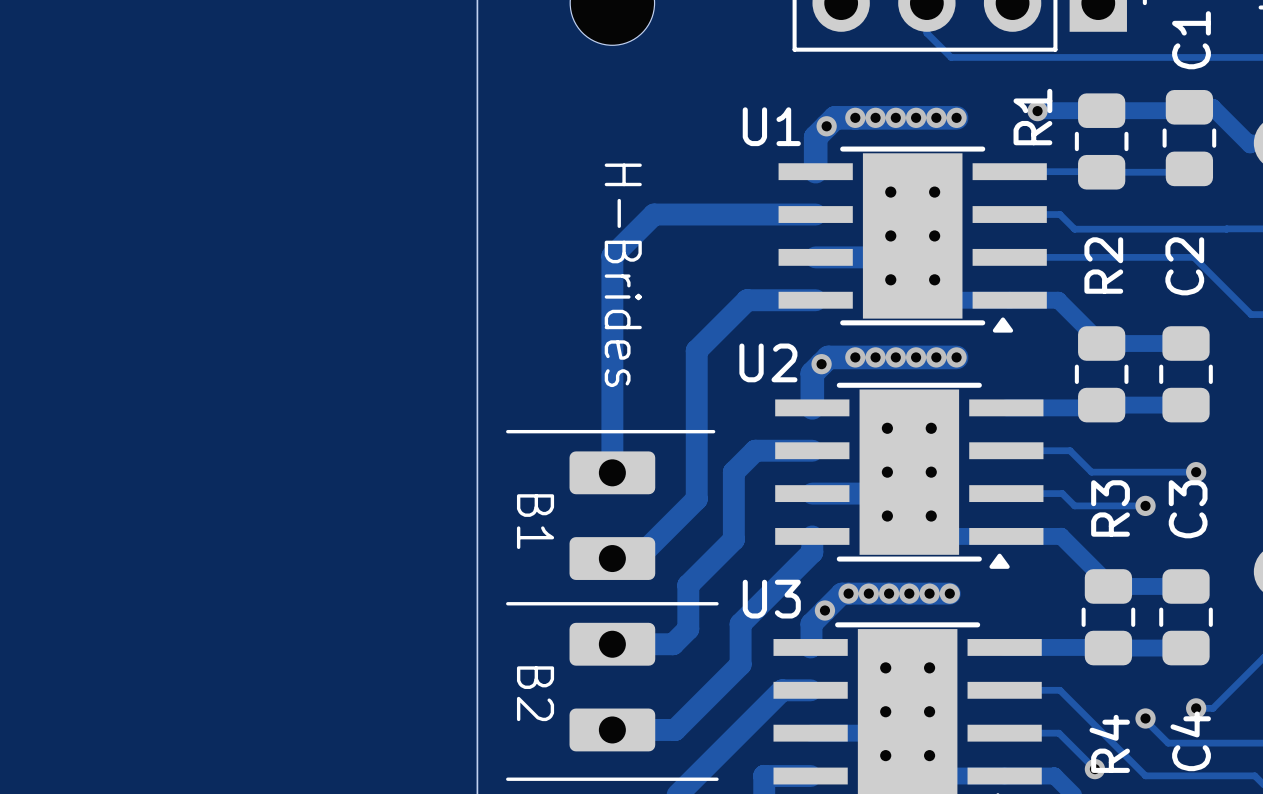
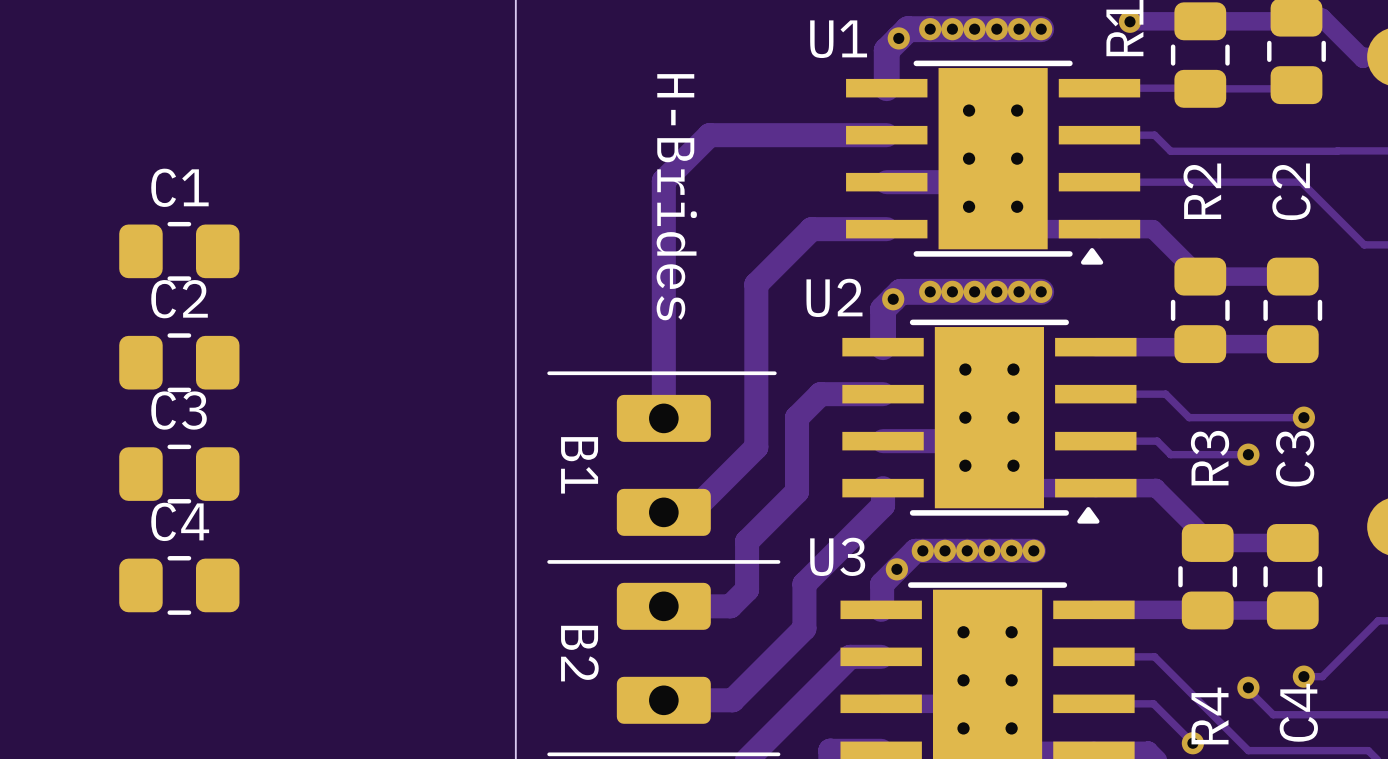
C1: none -> (179, 251)
C2: none -> (179, 362)
C3: none -> (179, 474)
C4: none -> (179, 585)

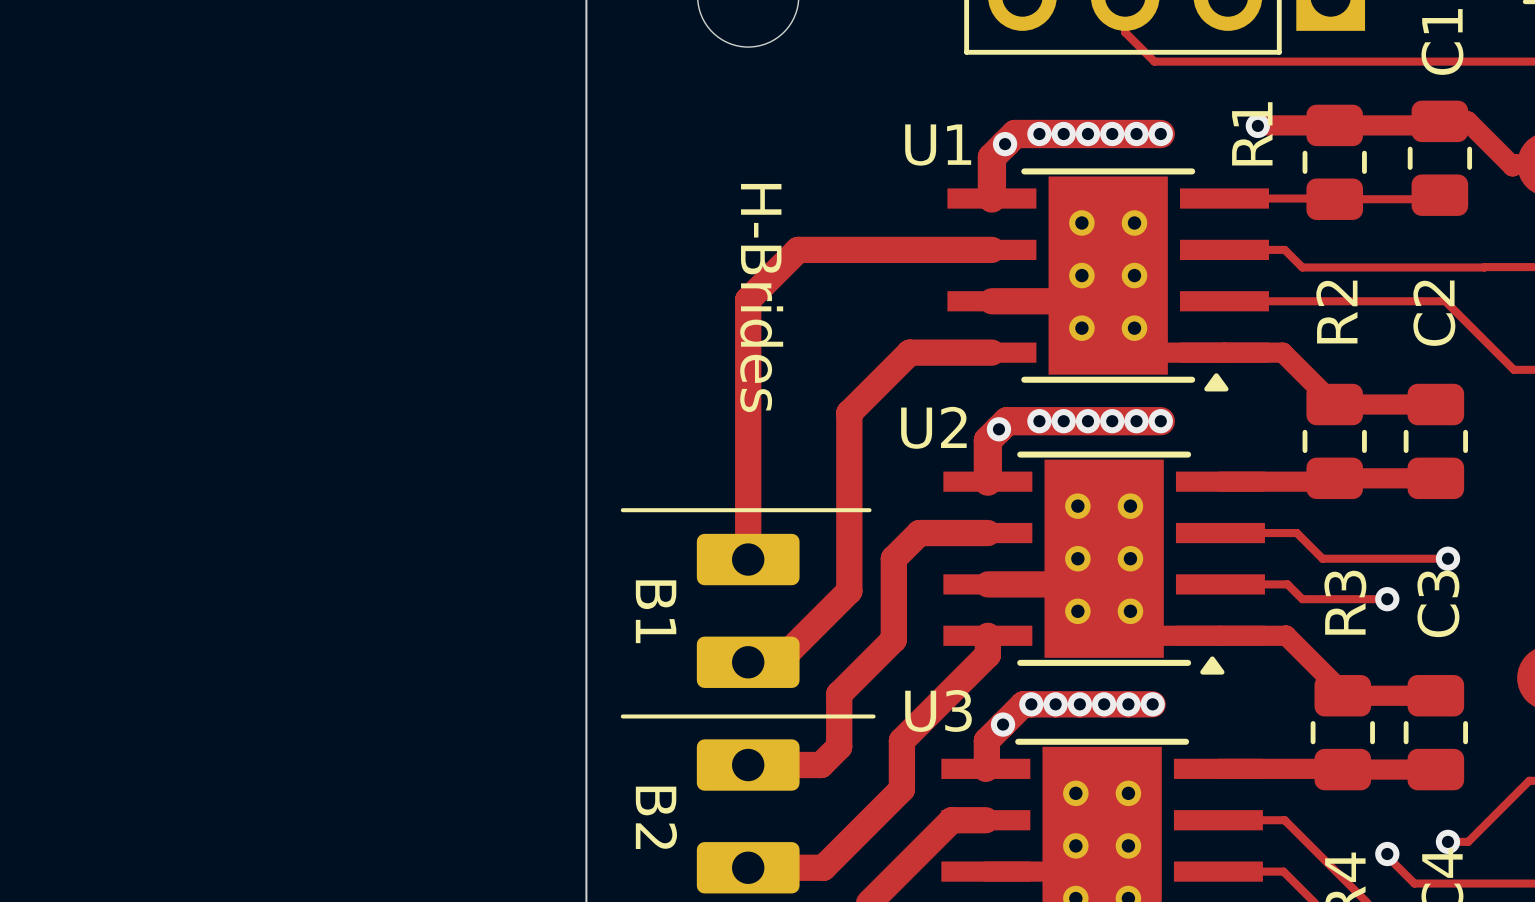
C1: (179, 251) -> none
C2: (179, 362) -> none
C3: (179, 474) -> none
C4: (179, 585) -> none

